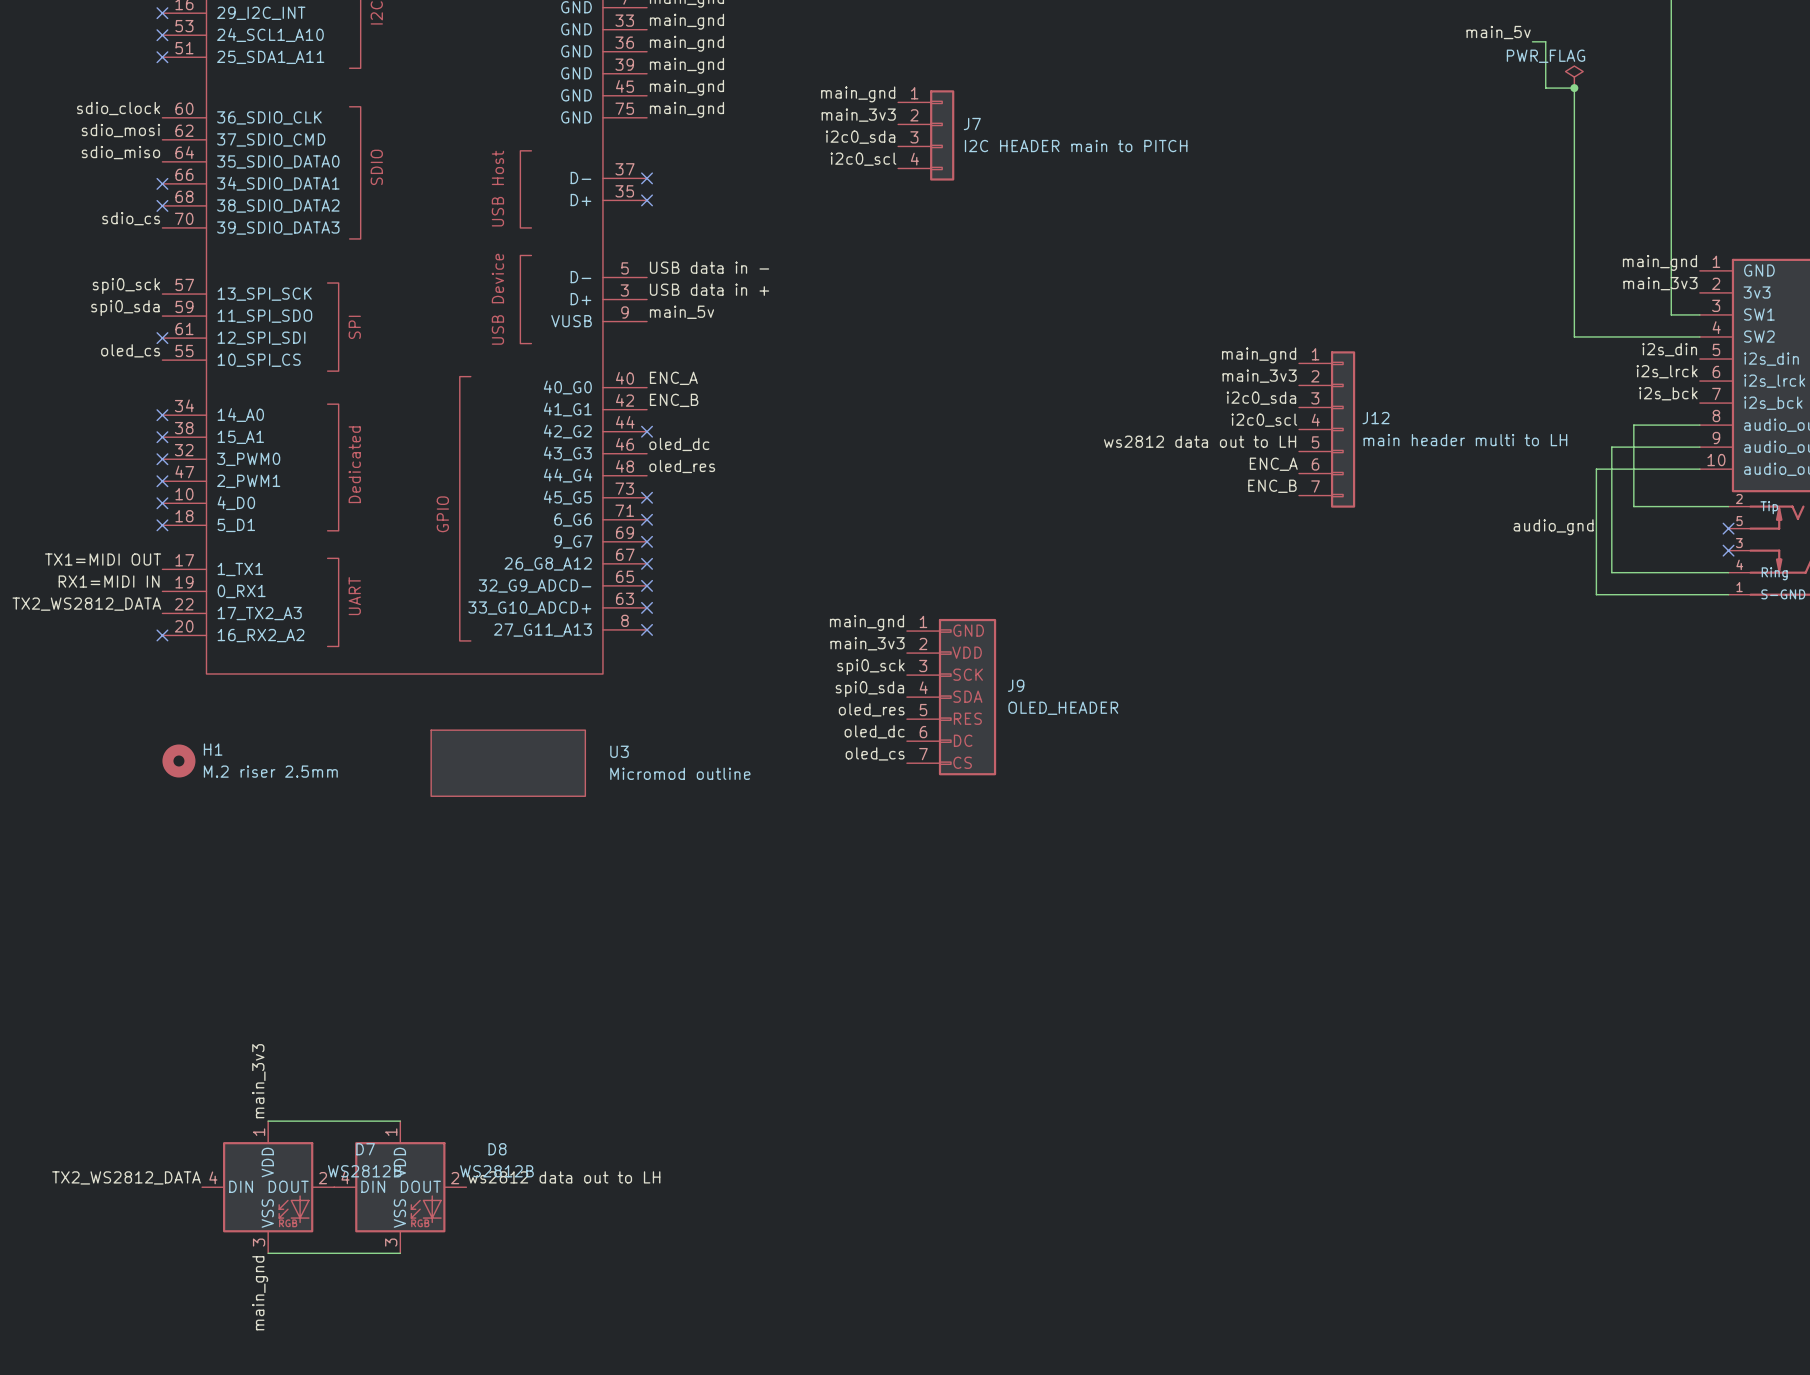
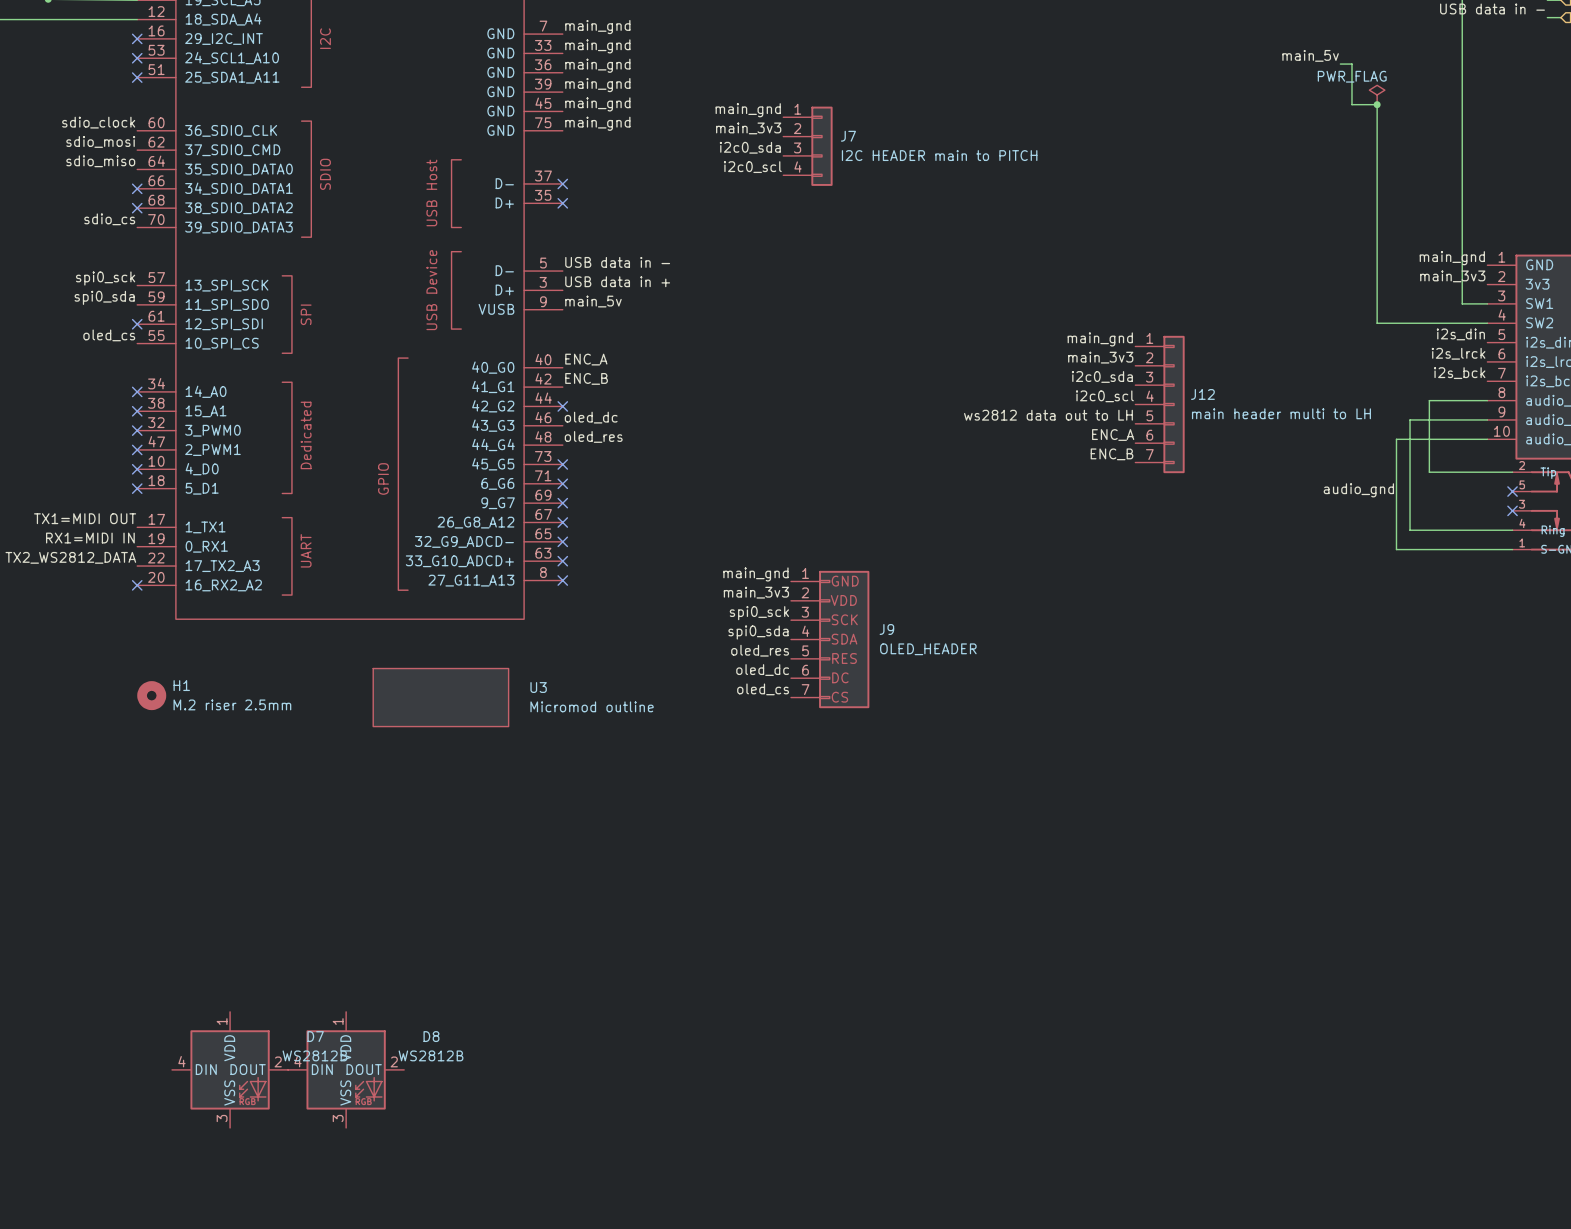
label: main_3v3 (258, 1081) -> none
wire: (268, 1121) (400, 1121) -> none
label: TX2_WS2812_DATA (126, 1177) -> none
label: ws2812 data out to LH (564, 1177) -> none
wire: (268, 1253) (400, 1253) -> none
label: main_gnd (260, 1293) -> none

